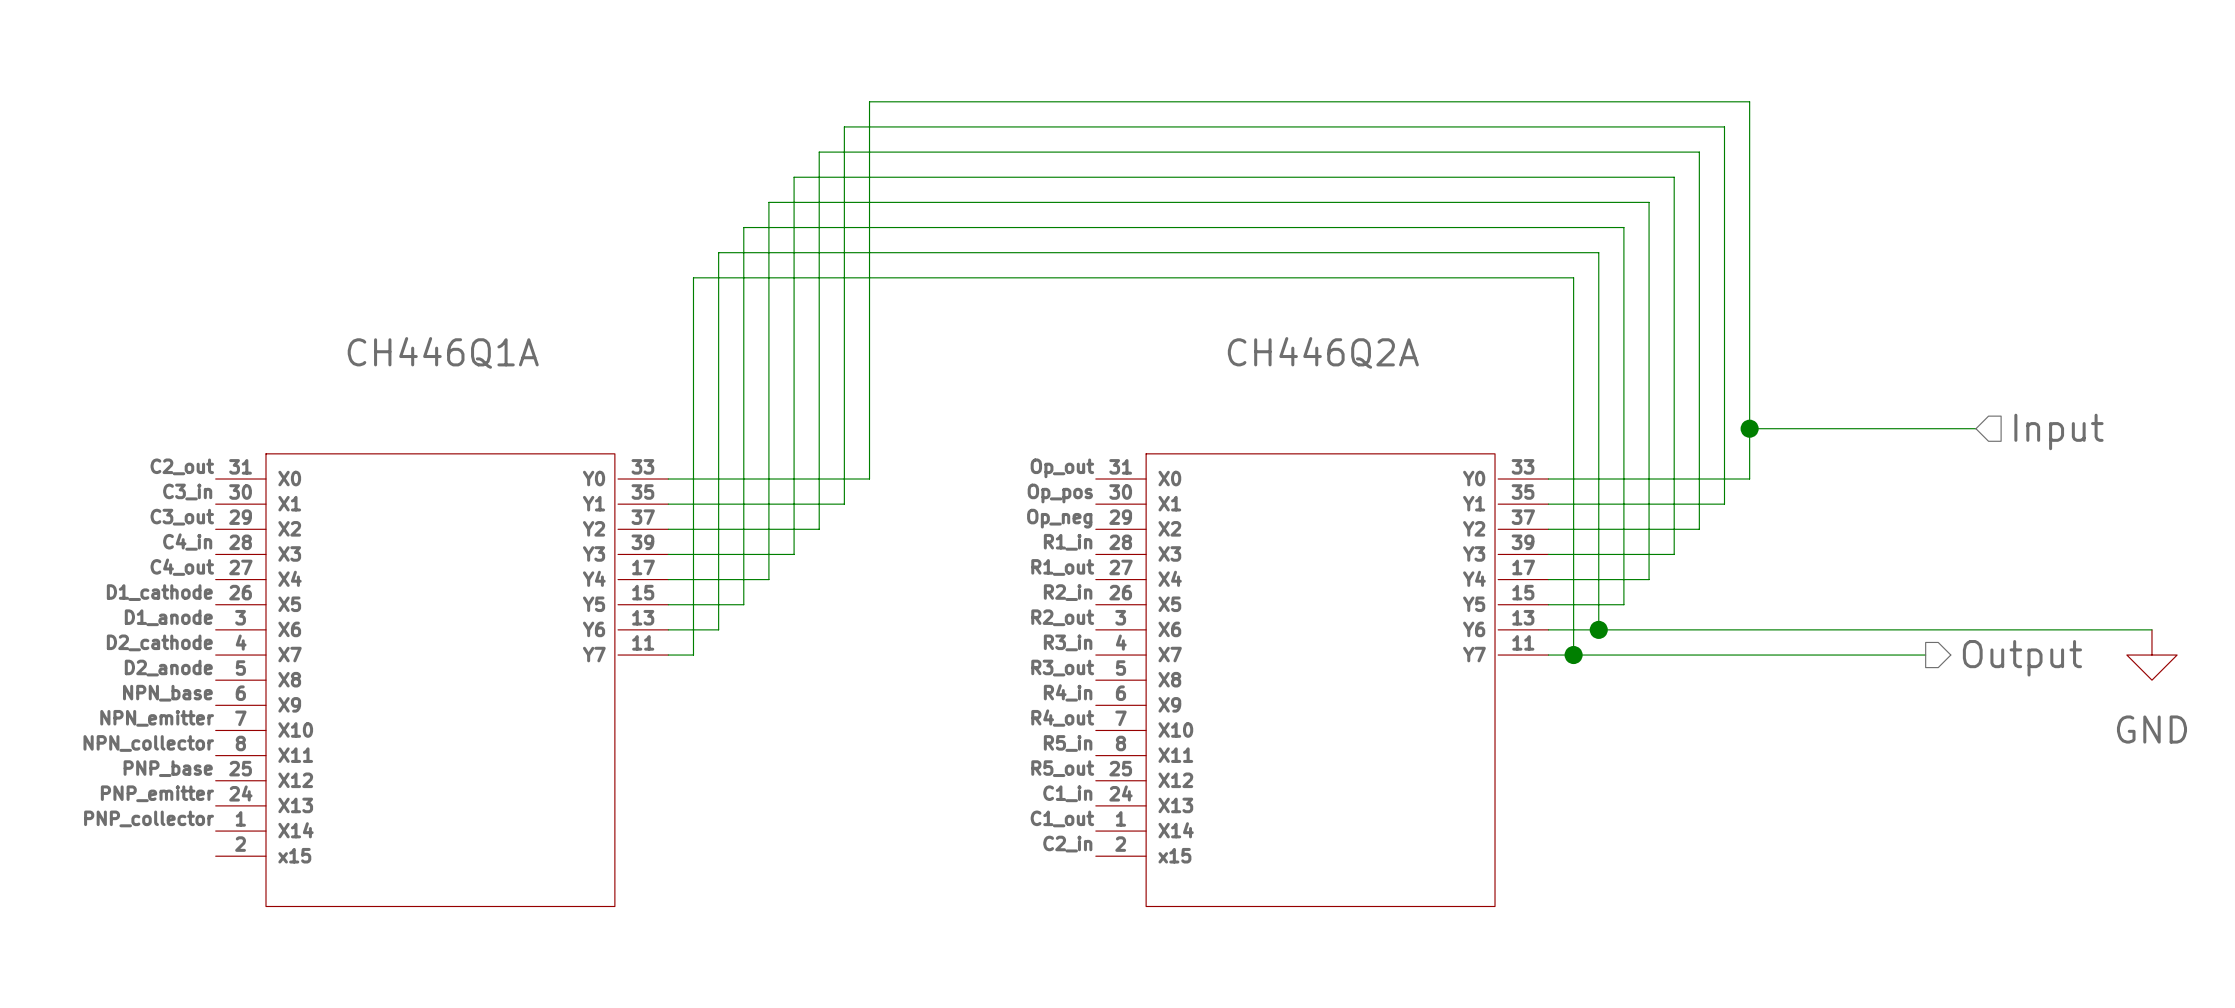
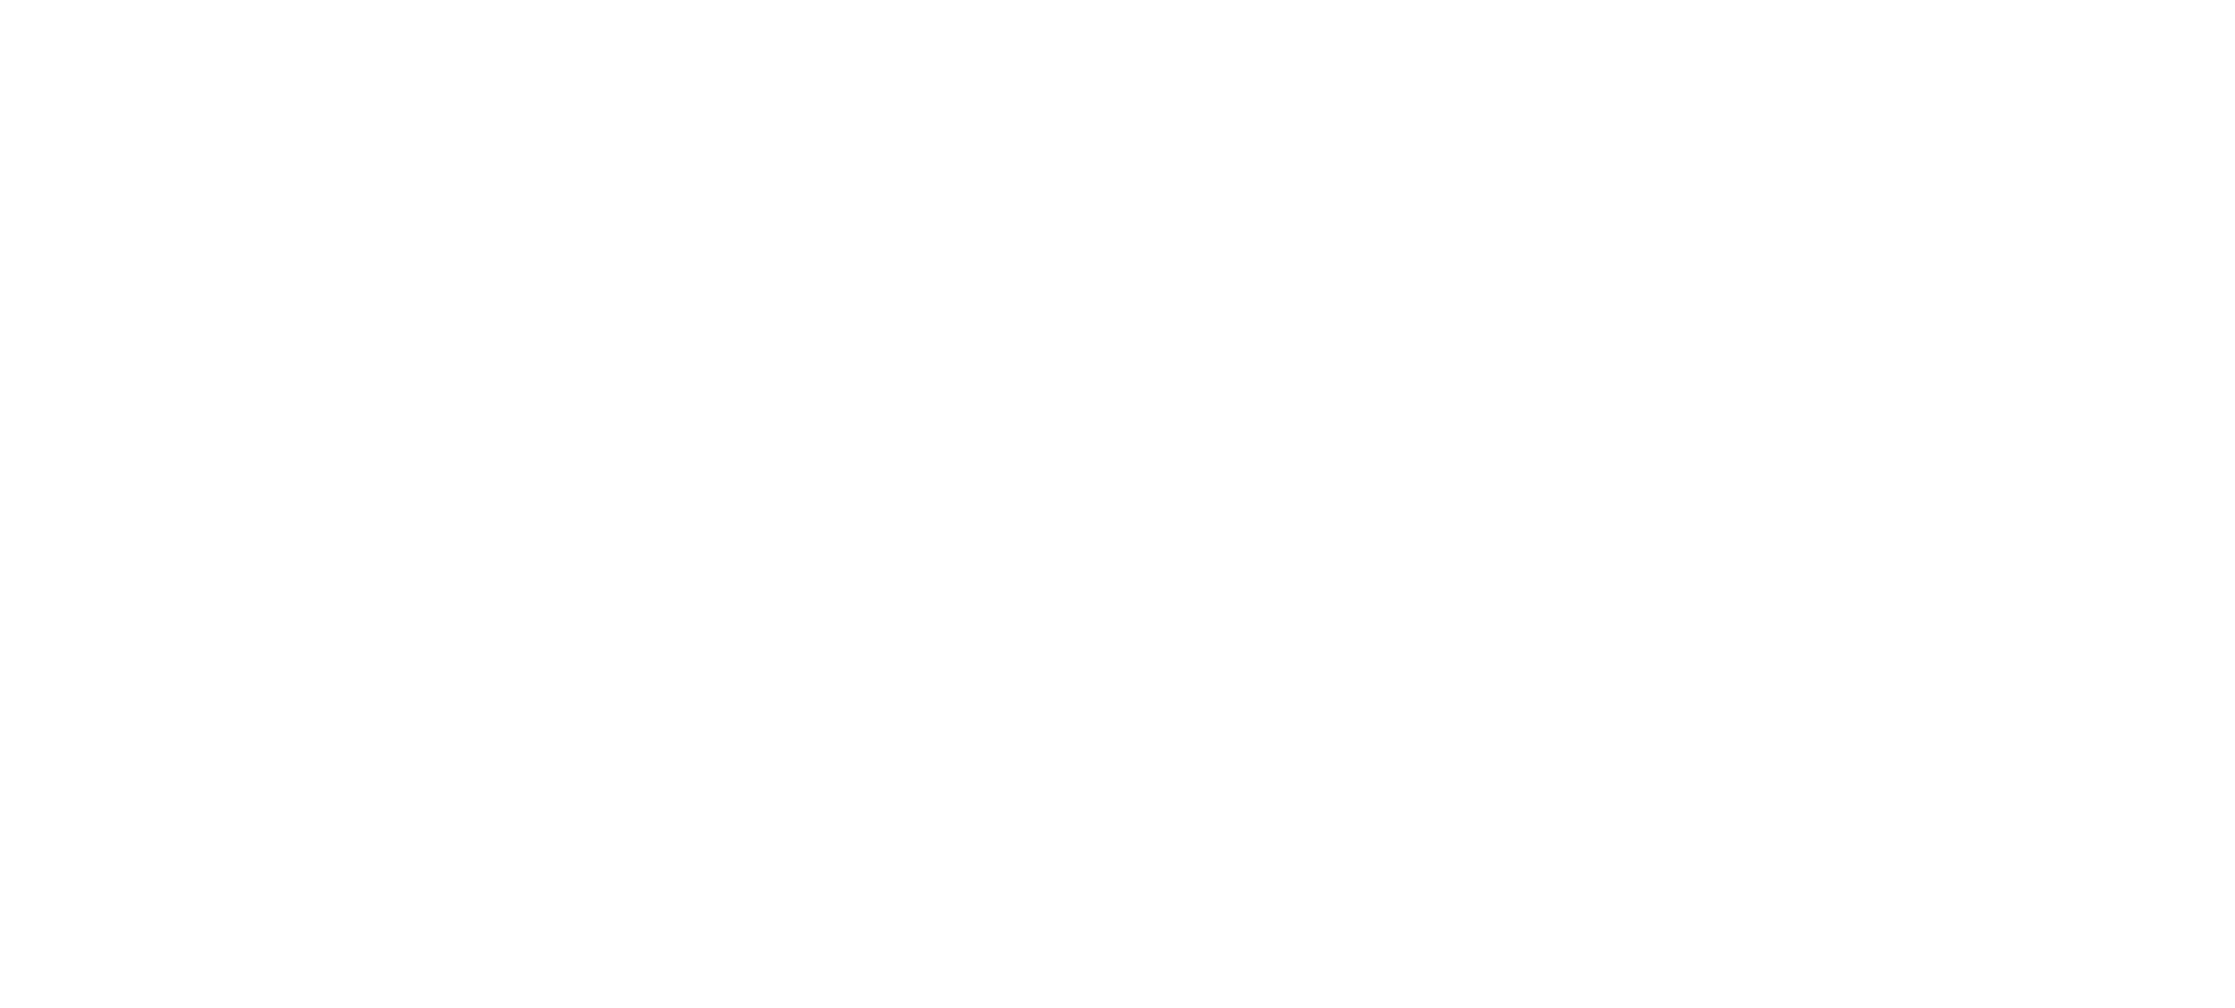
wire: (1749, 428) (1975, 428) -> none
junction: (1749, 428) -> none
hierarchical label: Input (2058, 431) -> none
label: C2_out (182, 466) -> none
label: Op_out (1062, 468) -> none
wire: (668, 479) (869, 479) (869, 101) (1749, 101) (1749, 479) (1548, 479) -> none
label: C3_in (187, 492) -> none
label: Op_pos (1060, 493) -> none
wire: (668, 504) (844, 504) (844, 126) (1724, 126) (1724, 504) (1548, 504) -> none
label: C3_out (182, 517) -> none
label: Op_neg (1059, 518) -> none
wire: (668, 529) (819, 529) (819, 152) (1699, 152) (1699, 529) (1548, 529) -> none
label: C4_in (187, 542) -> none
label: R1_in (1068, 542) -> none
wire: (668, 554) (794, 554) (794, 177) (1674, 177) (1674, 554) (1548, 554) -> none
label: C4_out (182, 567) -> none
label: R1_out (1062, 567) -> none
wire: (668, 579) (768, 579) (768, 202) (1649, 202) (1649, 579) (1548, 579) -> none
label: D1_cathode (159, 592) -> none
label: R2_in (1068, 592) -> none
wire: (668, 604) (743, 604) (743, 227) (1623, 227) (1623, 604) (1548, 604) -> none
label: D1_anode (168, 617) -> none
label: R2_out (1062, 617) -> none
wire: (668, 629) (718, 629) (718, 252) (1598, 252) (1598, 629) -> none
wire: (1548, 629) (2151, 629) -> none
junction: (1598, 629) -> none
label: D2_cathode (159, 642) -> none
label: R3_in (1068, 642) -> none
wire: (668, 655) (693, 655) (693, 277) (1573, 277) (1573, 655) -> none
wire: (1548, 655) (1925, 655) -> none
junction: (1573, 655) -> none
power symbol: GND (2151, 655) -> none
hierarchical label: Output (2022, 658) -> none
label: D2_anode (168, 668) -> none
label: R3_out (1062, 668) -> none
CH446Q1A: (442, 680) -> none
CH446Q2A: (1322, 680) -> none
label: R4_in (1068, 692) -> none
label: NPN_base (167, 693) -> none
label: NPN_emitter (157, 718) -> none
label: R4_out (1062, 718) -> none
label: NPN_collector (148, 743) -> none
label: R5_in (1068, 743) -> none
label: PNP_base (168, 768) -> none
label: R5_out (1062, 768) -> none
label: PNP_emitter (157, 793) -> none
label: C1_in (1067, 793) -> none
label: PNP_collector (149, 818) -> none
label: C1_out (1062, 818) -> none
label: C2_in (1067, 844) -> none

